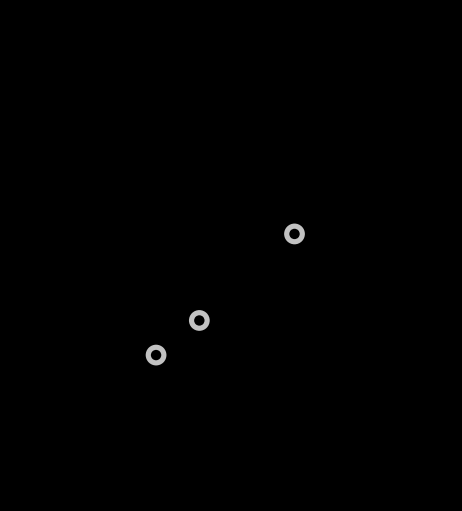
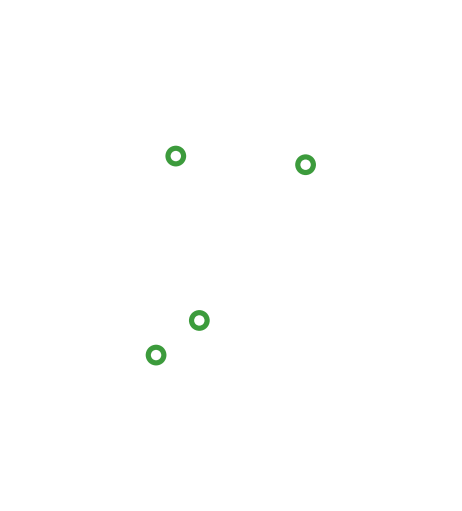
via: none -> (175, 156)
via position: (294, 233) -> (305, 164)

